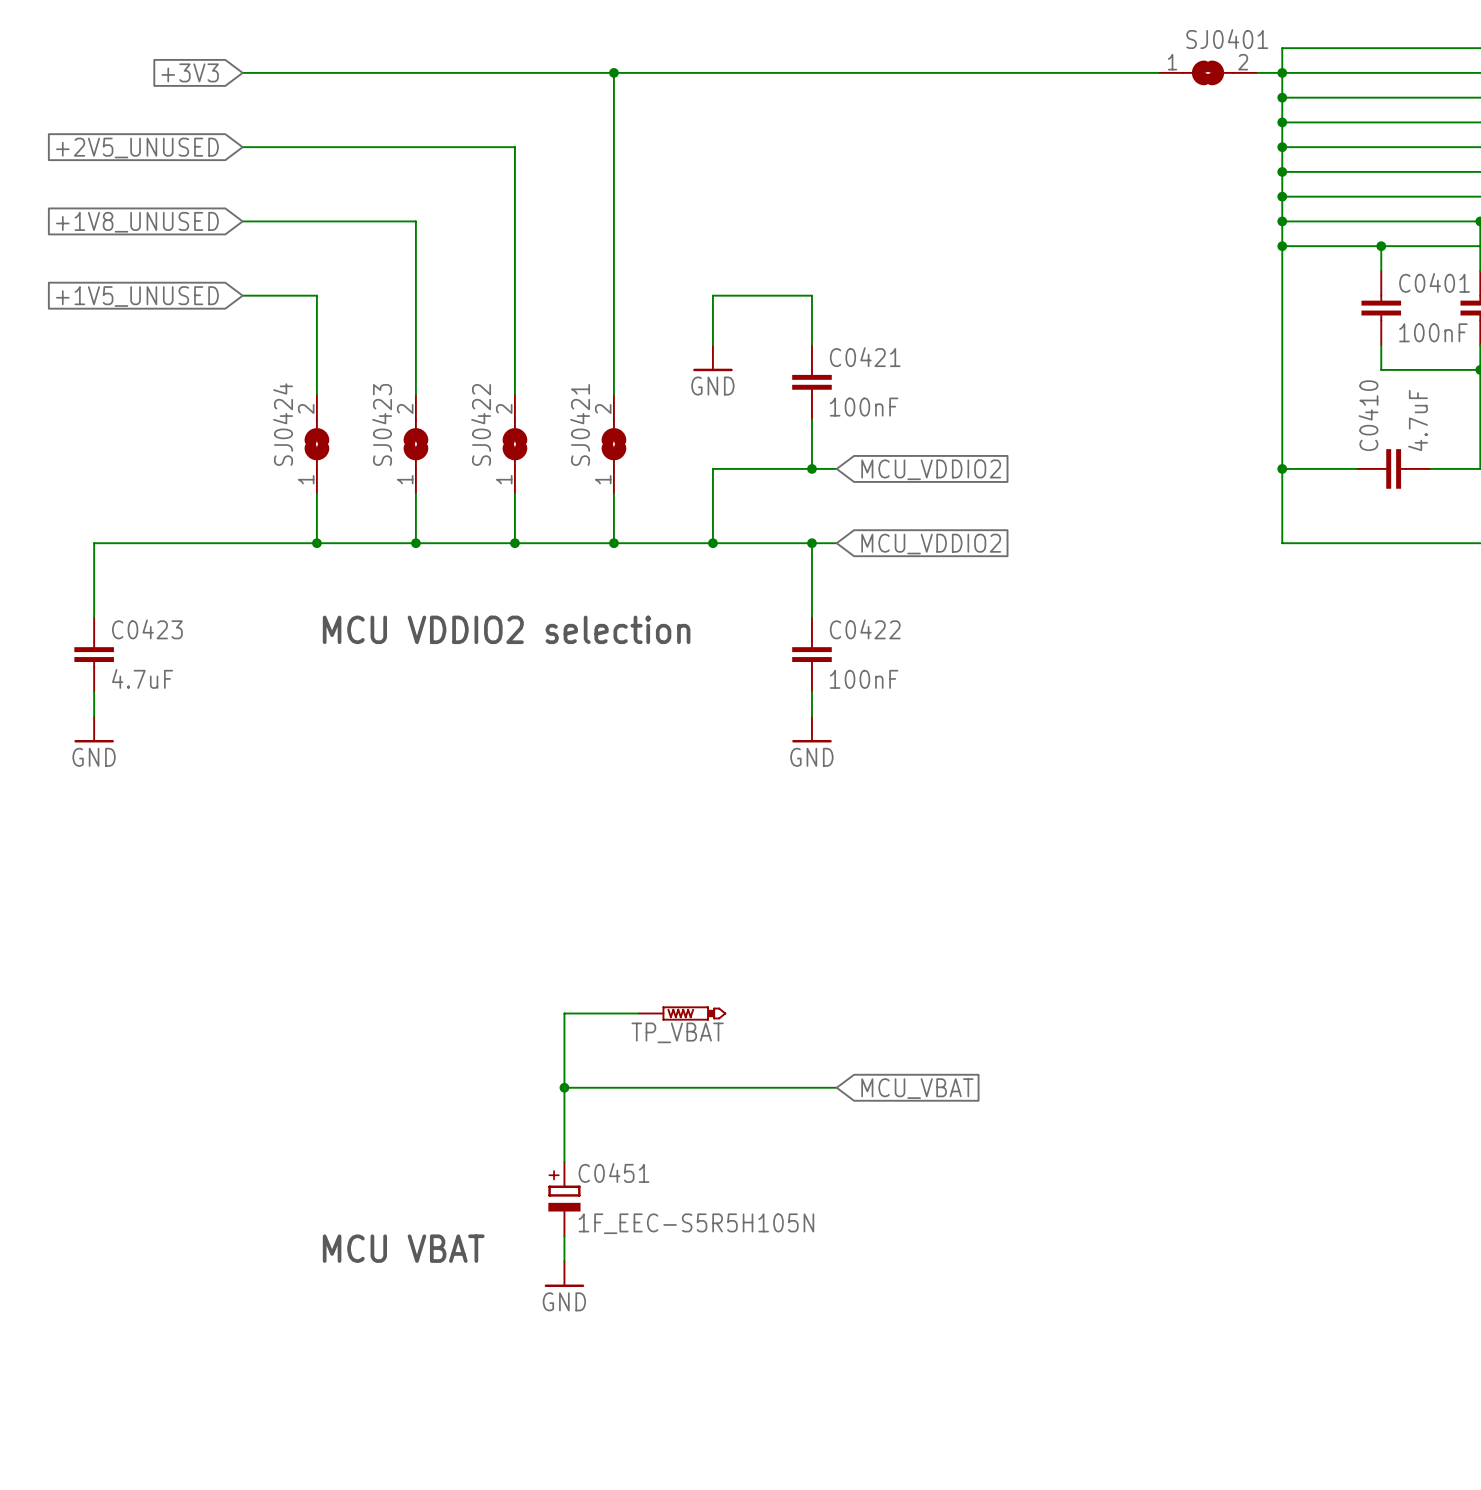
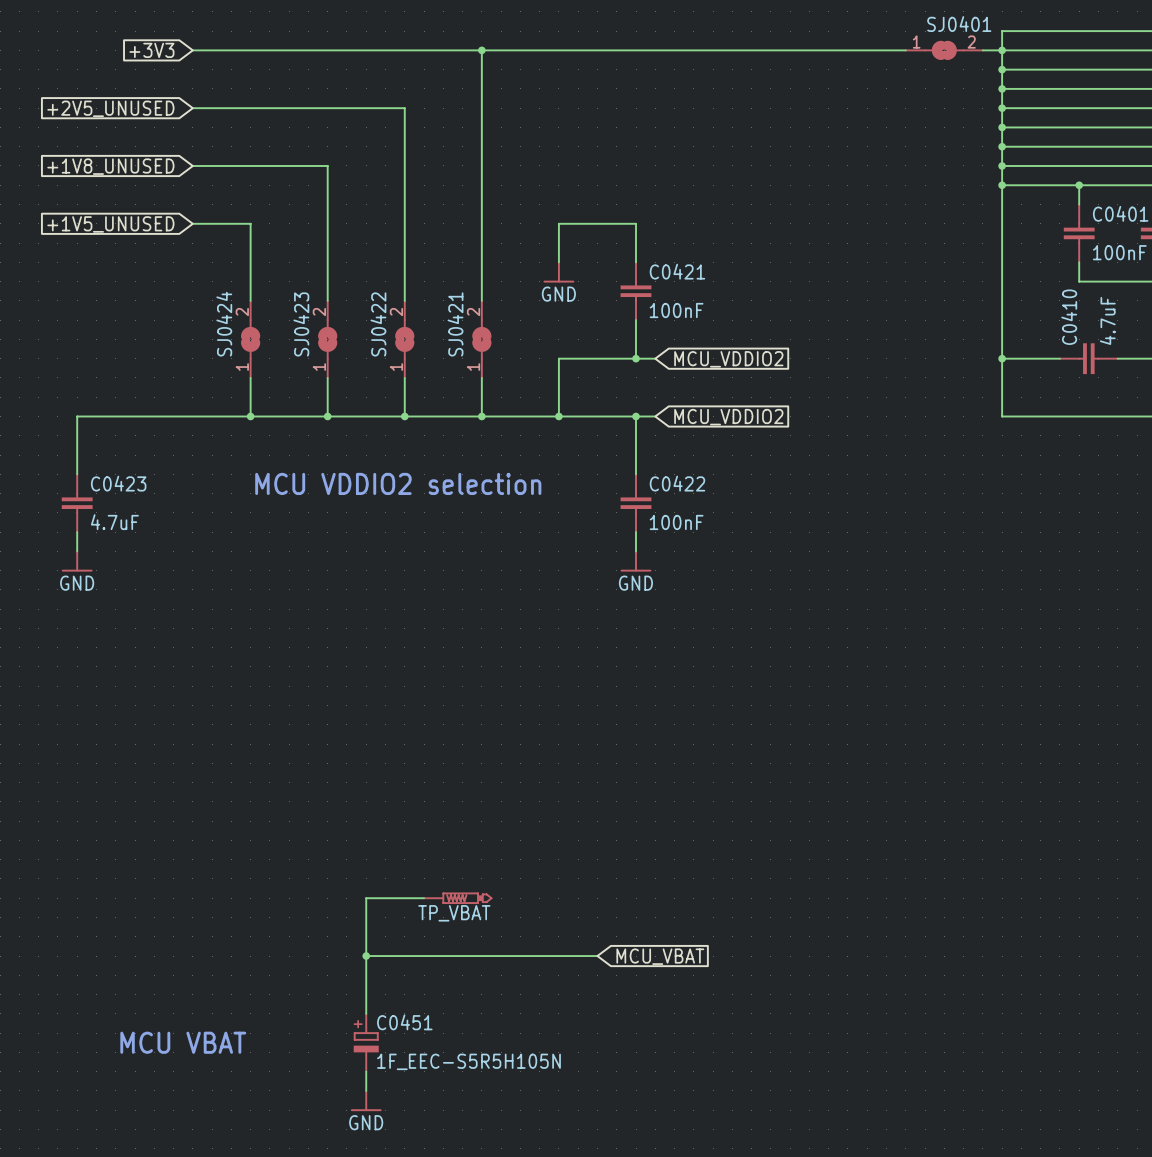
wire: (638, 1013) (564, 1013) (564, 1162) -> (424, 898) (366, 898) (366, 1013)
TP_VBAT position: (682, 1013) -> (458, 898)
wire: (564, 1087) (836, 1087) -> none
junction: (564, 1087) -> none
global label position: MCU_VBAT (917, 1088) -> MCU_VBAT (660, 956)
C0451 position: (564, 1199) -> (366, 1042)
wire: none -> (366, 956) (597, 956)
junction: none -> (366, 956)
wire: (564, 1236) (564, 1261) -> (366, 1071) (366, 1090)
text position: MCU VBAT (403, 1248) -> MCU VBAT (183, 1042)
power symbol position: GND (564, 1274) -> GND (366, 1101)

